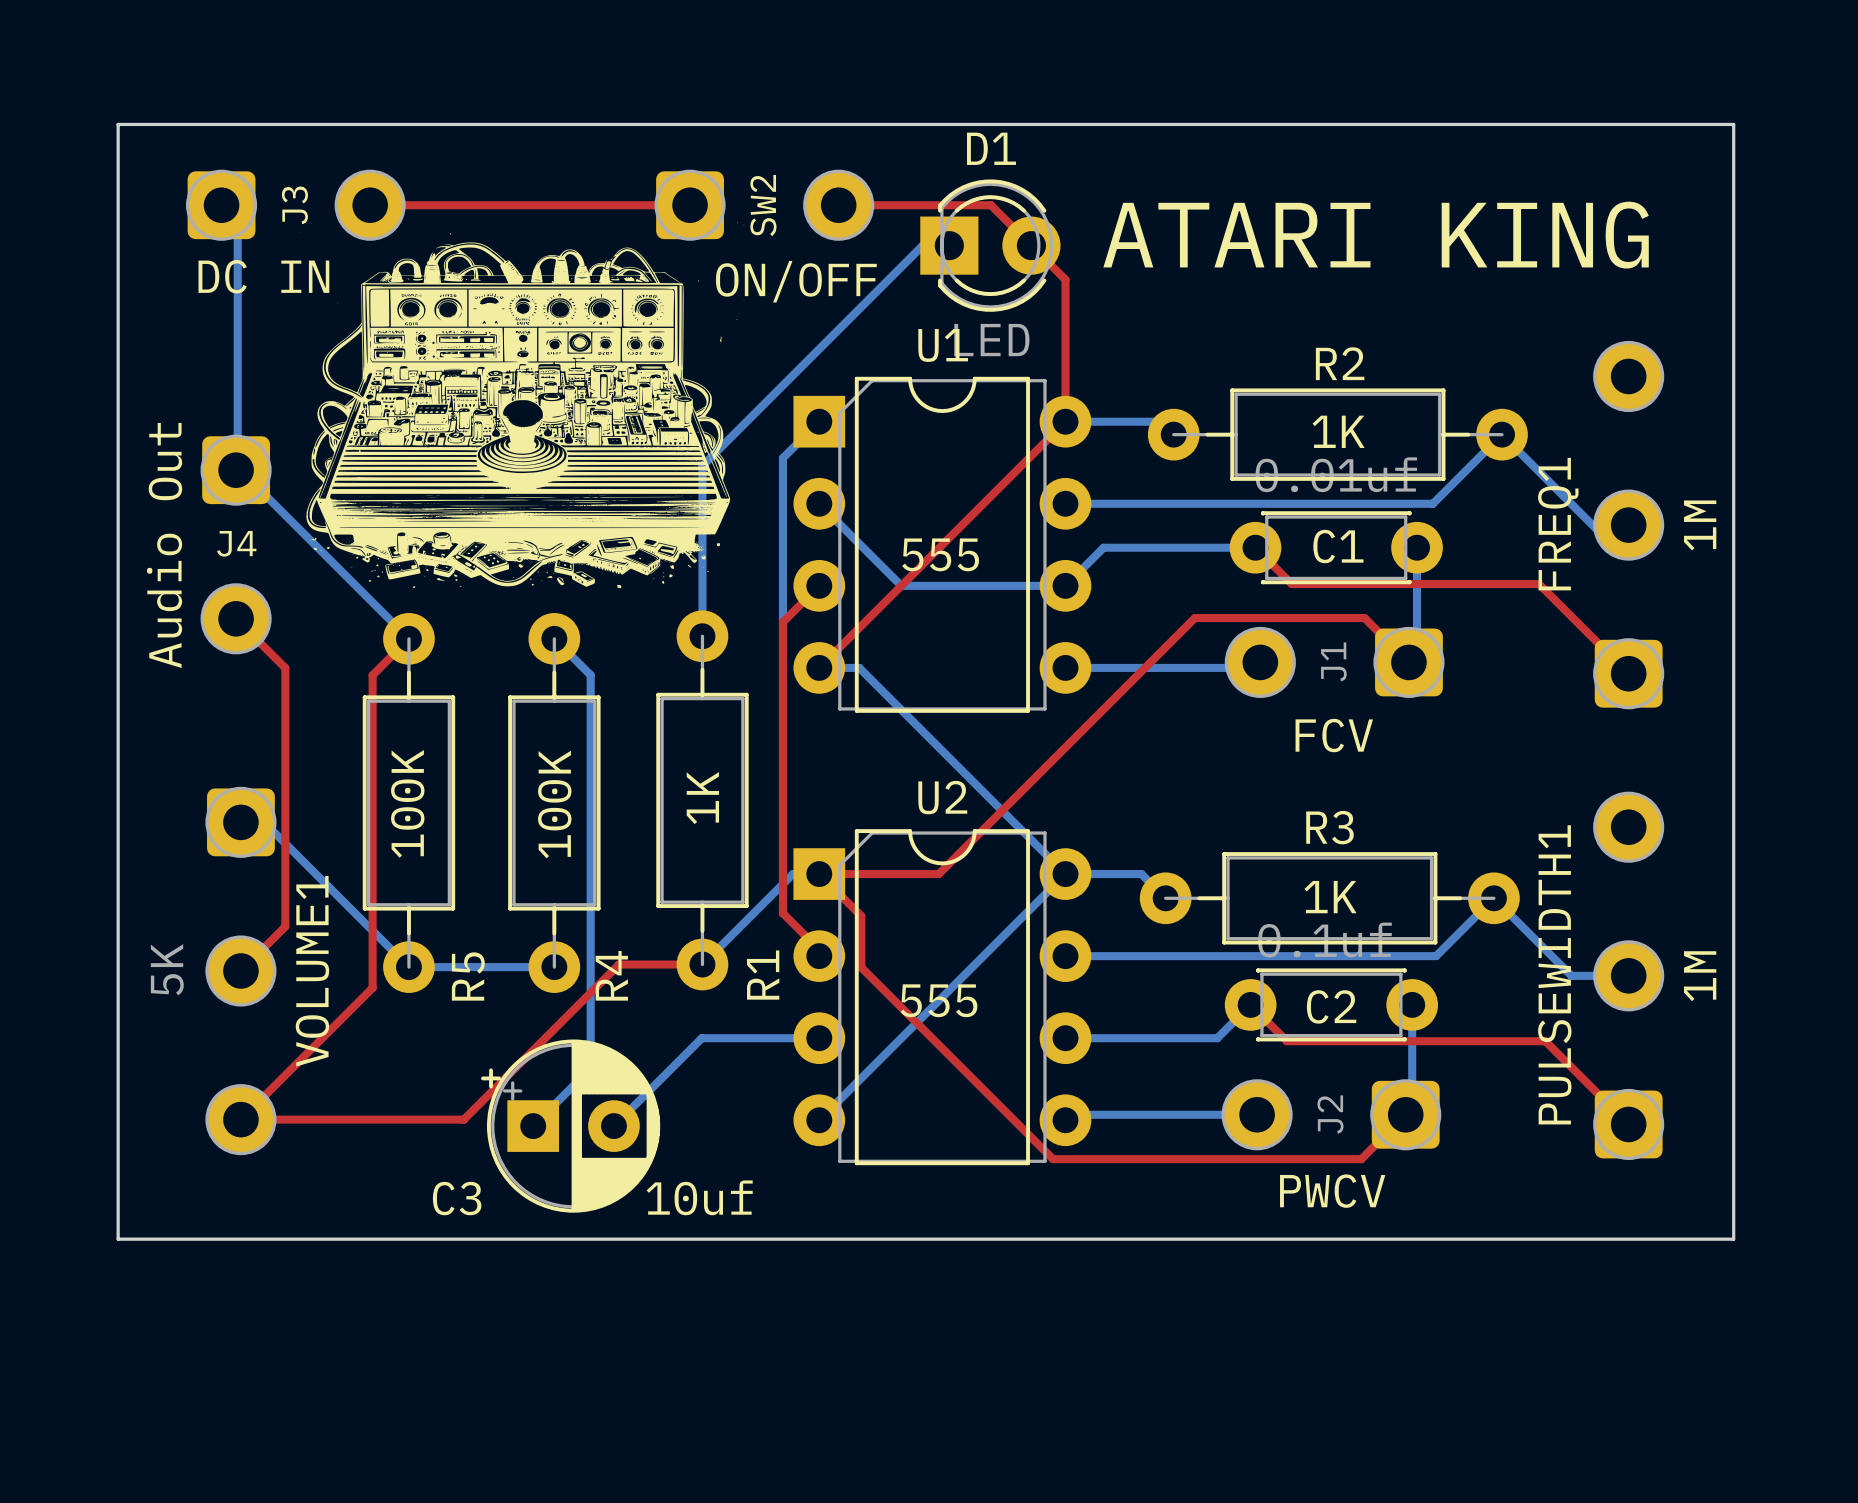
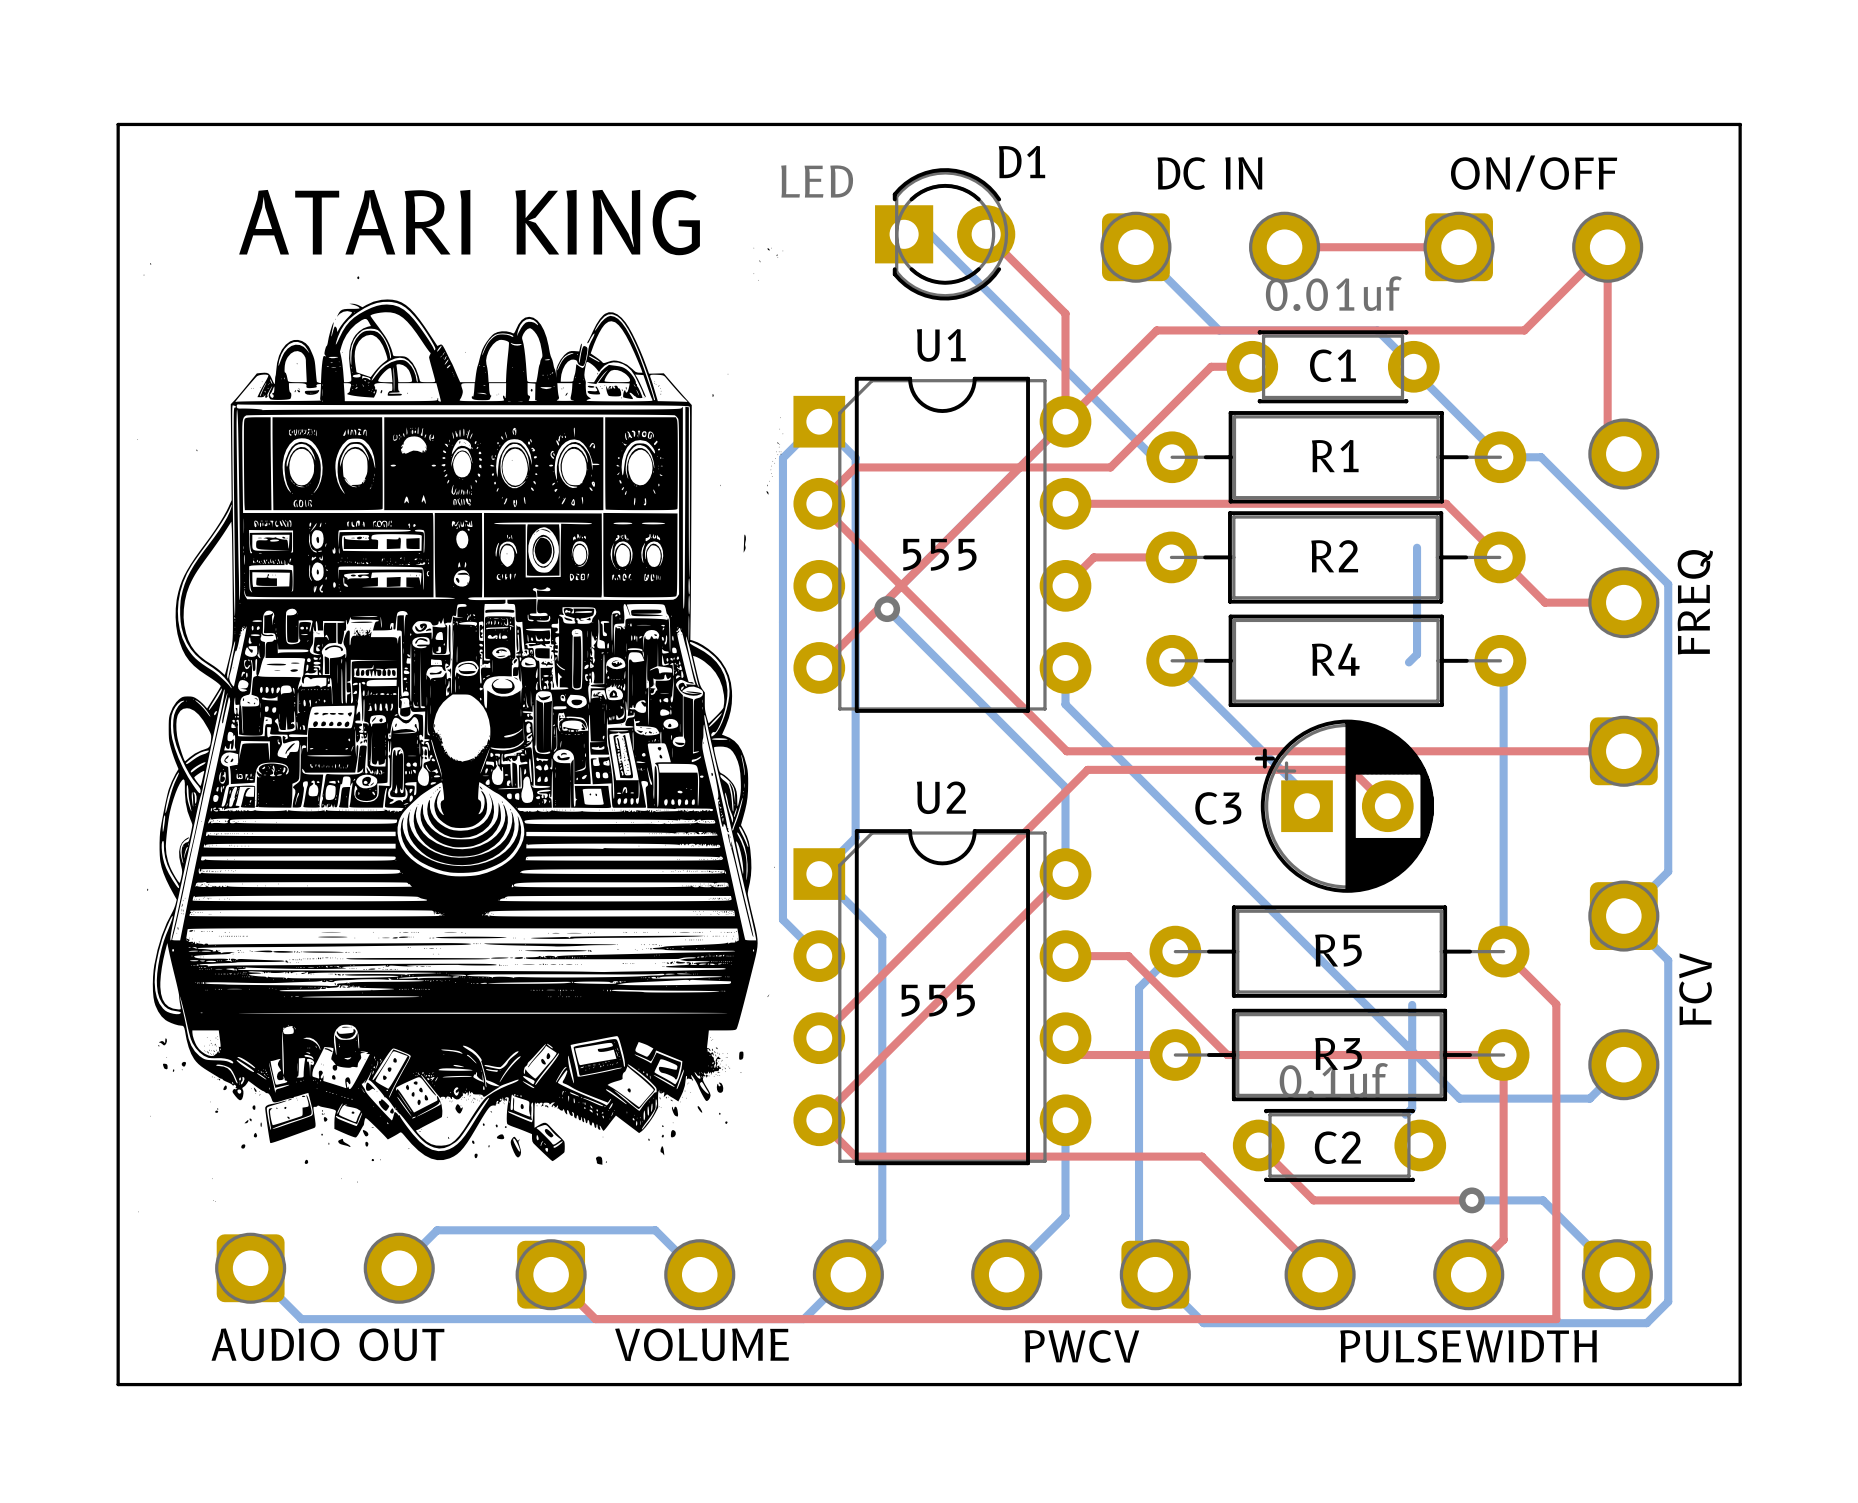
board edge: (1733, 124) (1733, 1239) (118, 1239) -> (1733, 124) (1740, 124) (1740, 1384) (118, 1384) (118, 1239)
D1 name position: D1 (991, 148) -> D1 (1022, 162)
J3: DC IN (295, 205) -> none
top track: (370, 205) (690, 205) -> none
SW2: ON/OFF (764, 205) -> none
top track: (838, 205) (991, 205) (1065, 279) (1065, 313) -> (986, 234) (1065, 313)
drawing: [300, 221, 746, 596] -> none
text: none -> ATARI KING (469, 222)
bottom track: none -> (904, 234) (930, 234) (1153, 457) (1172, 457)
text: ATARI KING (1376, 235) -> none
bottom track: (237, 237) (237, 468) (236, 470) (240, 470) (408, 638) -> none
bottom track: (949, 245) (922, 245) (702, 465) (702, 636) -> none
D1 position: (990, 245) -> (945, 234)
drawing: none -> [137, 247, 784, 1213]
bottom track: none -> (1135, 247) (1219, 330) (1377, 330) (1413, 366) (1413, 370) (1500, 457) (1541, 457) (1668, 584) (1668, 871) (1623, 916) (1668, 960) (1668, 1301) (1646, 1323) (1203, 1323) (1139, 1258) (1139, 987) (1175, 951)
DC IN: none -> (1210, 247)
top track: none -> (1284, 247) (1459, 247)
ON/OFF: none -> (1533, 247)
D1 value position: LED (991, 340) -> LED (817, 181)
R2 name position: R2 (1340, 363) -> R2 (1334, 556)
top track: none -> (1252, 366) (1211, 366) (1110, 467) (855, 467) (819, 503) (1066, 751) (1623, 751)
bottom track: none -> (819, 421) (855, 458) (855, 837) (819, 874) (882, 937) (882, 1240) (803, 1319) (301, 1319) (250, 1268)
top track: none -> (1065, 421) (1156, 330) (1524, 330) (1607, 247) (1607, 437) (1623, 454)
bottom track: (1065, 421) (1160, 421) (1173, 434) -> none
R2 value: 1K (1338, 431) -> none
R2 position: (1337, 434) -> (1335, 557)
bottom track: (819, 503) (901, 585) (1065, 585) (1103, 547) (1255, 547) -> none
top track: none -> (1065, 503) (1446, 503) (1544, 602) (1623, 602)
bottom track: (1065, 503) (1432, 503) (1502, 434) (1597, 529) (1631, 529) (1628, 525) -> none
FREQ1: 1M (1628, 525) -> none
J4: Audio Out (236, 544) -> none
top track: (1255, 547) (1291, 584) (1538, 584) (1628, 673) -> none
C1 position: (1336, 547) -> (1333, 366)
top track: none -> (1171, 557) (1093, 557) (1065, 585)
top track: (819, 585) (782, 622) (782, 913) (819, 949) (819, 956) -> none
FREQ: none -> (1623, 602)
via: none -> (887, 609)
top track: (236, 618) (285, 668) (285, 926) (240, 970) -> none
top track: (408, 638) (372, 675) (372, 987) (240, 1119) (463, 1119) (618, 964) (702, 964) -> none
bottom track: (554, 638) (590, 675) (590, 1068) (533, 1126) -> none
bottom track: none -> (1172, 660) (1307, 795) (1307, 806)
bottom track: none -> (1500, 660) (1503, 664) (1503, 951)
bottom track: (1260, 662) (1254, 667) (1065, 667) -> (1623, 1064) (1589, 1098) (1459, 1098) (1065, 704) (1065, 667)
J1: FCV (1334, 662) -> none
top track: (1408, 662) (1364, 618) (1194, 618) (938, 874) (819, 874) (861, 916) (861, 967) (1053, 1159) (1361, 1159) (1405, 1114) -> none
bottom track: (819, 667) (859, 667) (1065, 874) -> (1065, 421) (887, 600) (887, 609) (1065, 787) (1065, 874)
R1 value: 1K (702, 798) -> none
R1 rotation: 0° (702, 800) -> 90° clockwise (1336, 457)
R1 position: (702, 800) -> (1336, 457)
R5 rotation: 0° (408, 802) -> 90° clockwise (1339, 951)
R5 position: (408, 802) -> (1339, 951)
R4 rotation: 0° (554, 802) -> 90° clockwise (1336, 660)
R4 position: (554, 802) -> (1336, 660)
R5 value: 100K (407, 803) -> none
R4 value: 100K (554, 804) -> none
top track: none -> (1387, 806) (1351, 769) (1087, 769) (819, 1038)
bottom track: (240, 822) (264, 822) (408, 967) (554, 967) -> none
R3 name position: R3 (1329, 827) -> R3 (1338, 1053)
bottom track: (819, 874) (792, 874) (702, 964) -> none
top track: none -> (1065, 874) (819, 1120) (855, 1156) (1202, 1156) (1320, 1274)
bottom track: (1065, 874) (1141, 874) (1165, 898) -> none
bottom track: (1065, 874) (819, 1120) -> none
bottom track: none -> (782, 884) (782, 919) (819, 956)
R3 value: 1K (1330, 897) -> none
R3 position: (1329, 898) -> (1339, 1055)
top track: none -> (1503, 951) (1556, 1004) (1556, 1319) (595, 1319) (551, 1274)
top track: none -> (1065, 956) (1128, 956) (1227, 1055) (1503, 1055) (1503, 1239) (1468, 1274)
bottom track: (1065, 956) (1436, 956) (1493, 898) (1571, 975) (1628, 975) -> none
VOLUME1: 5K (240, 970) -> none
R4 name position: R4 (611, 975) -> R4 (1335, 659)
R1 name position: R1 (763, 975) -> R1 (1335, 456)
PULSEWIDTH1: 1M (1628, 975) -> none
R5 name position: R5 (468, 976) -> R5 (1338, 950)
FCV: none -> (1623, 990)
top track: (1250, 1004) (1286, 1041) (1545, 1041) (1628, 1124) -> none
bottom track: (1250, 1004) (1217, 1038) (1065, 1038) -> none
C2 position: (1331, 1004) -> (1339, 1145)
bottom track: (819, 1038) (701, 1038) (613, 1126) -> none
top track: none -> (1065, 1038) (1082, 1055) (1175, 1055)
bottom track: (1257, 1114) (1070, 1114) (1065, 1120) -> (1006, 1274) (1065, 1215) (1065, 1120)
J2: PWCV (1331, 1114) -> none
C3 position: (570, 1126) -> (1344, 806)
top track: none -> (1258, 1145) (1313, 1200) (1471, 1200)
C3 value: 10uf (699, 1197) -> none
C3 name position: C3 (457, 1198) -> C3 (1218, 808)
bottom track: none -> (1471, 1200) (1543, 1200) (1617, 1274)
via: none -> (1471, 1200)
AUDIO OUT: none -> (324, 1268)
bottom track: none -> (399, 1268) (437, 1230) (655, 1230) (699, 1274)
VOLUME: none -> (699, 1274)
PWCV: none -> (1081, 1274)
PULSEWIDTH: none -> (1468, 1274)

